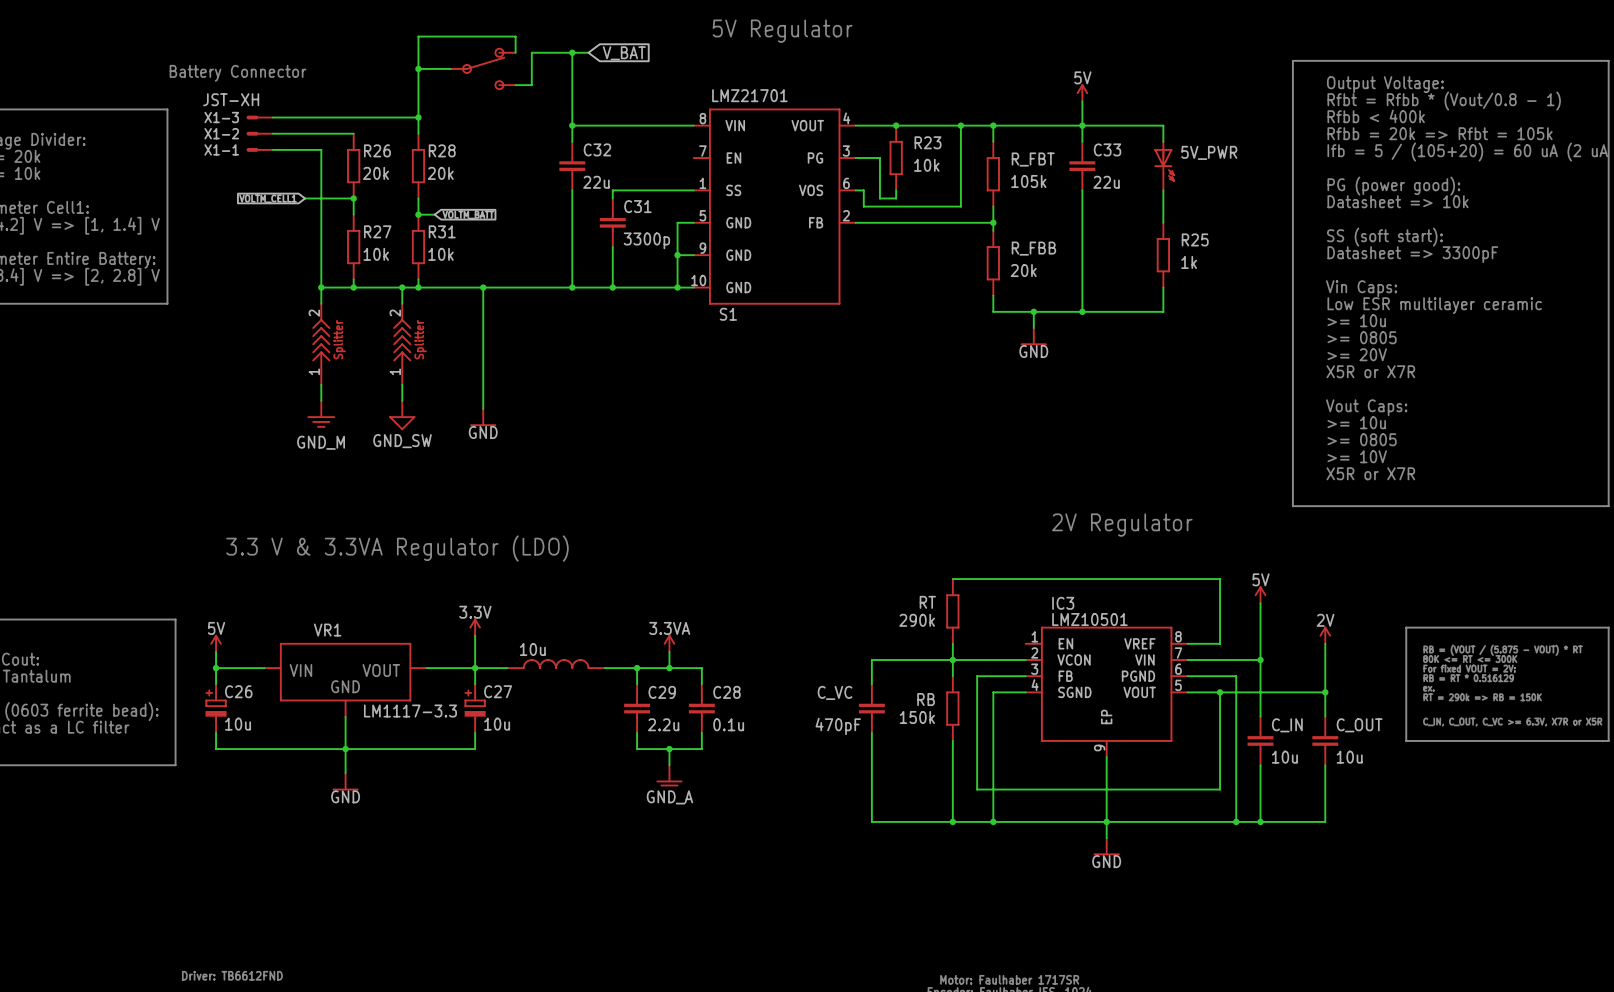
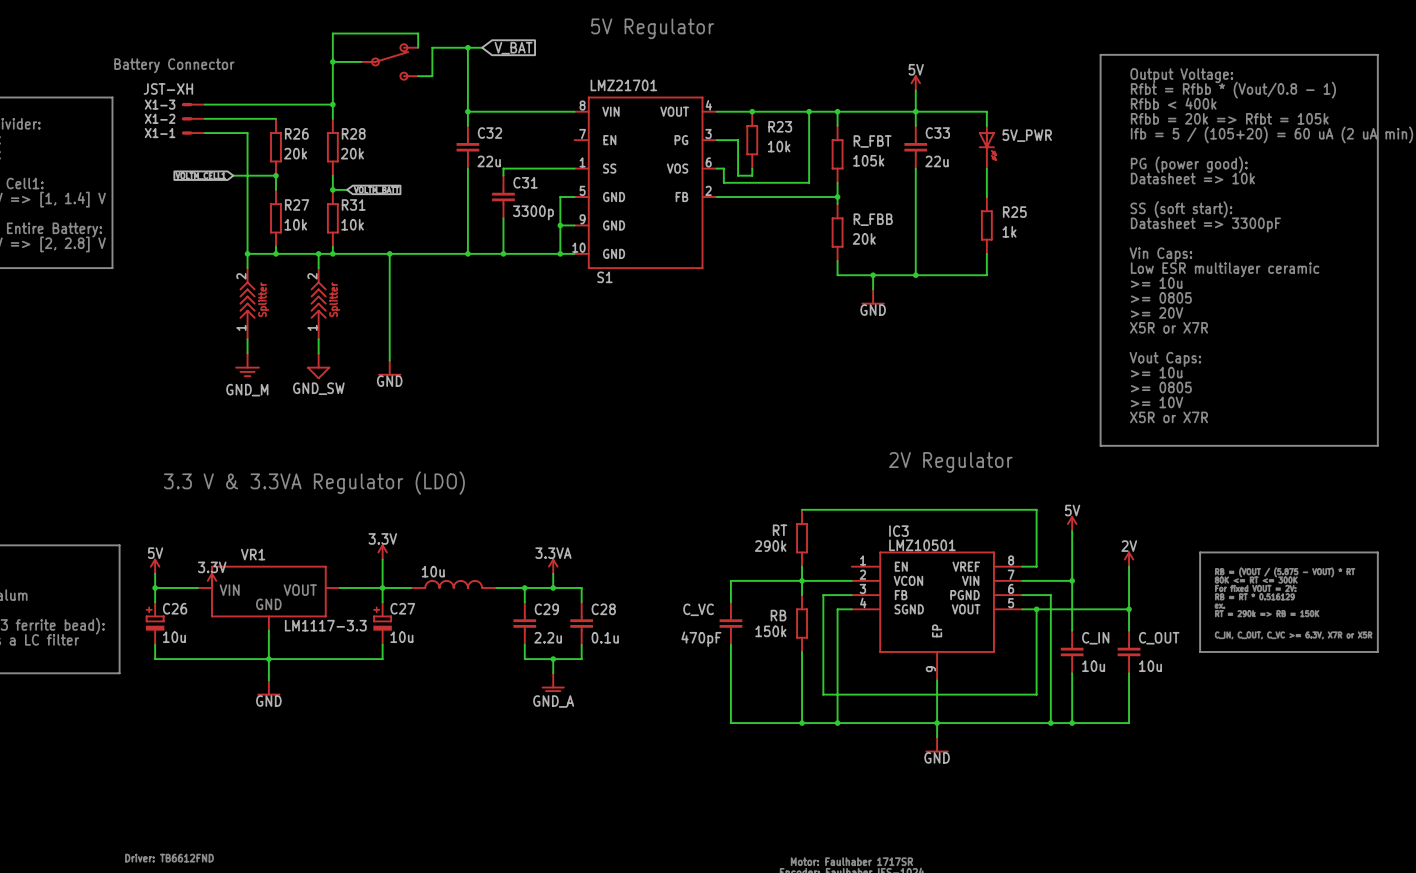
IC3 symbol: [1025, 626, 1188, 758] -> [851, 551, 1023, 681]
power symbol: none -> 3.3V (212, 580)

